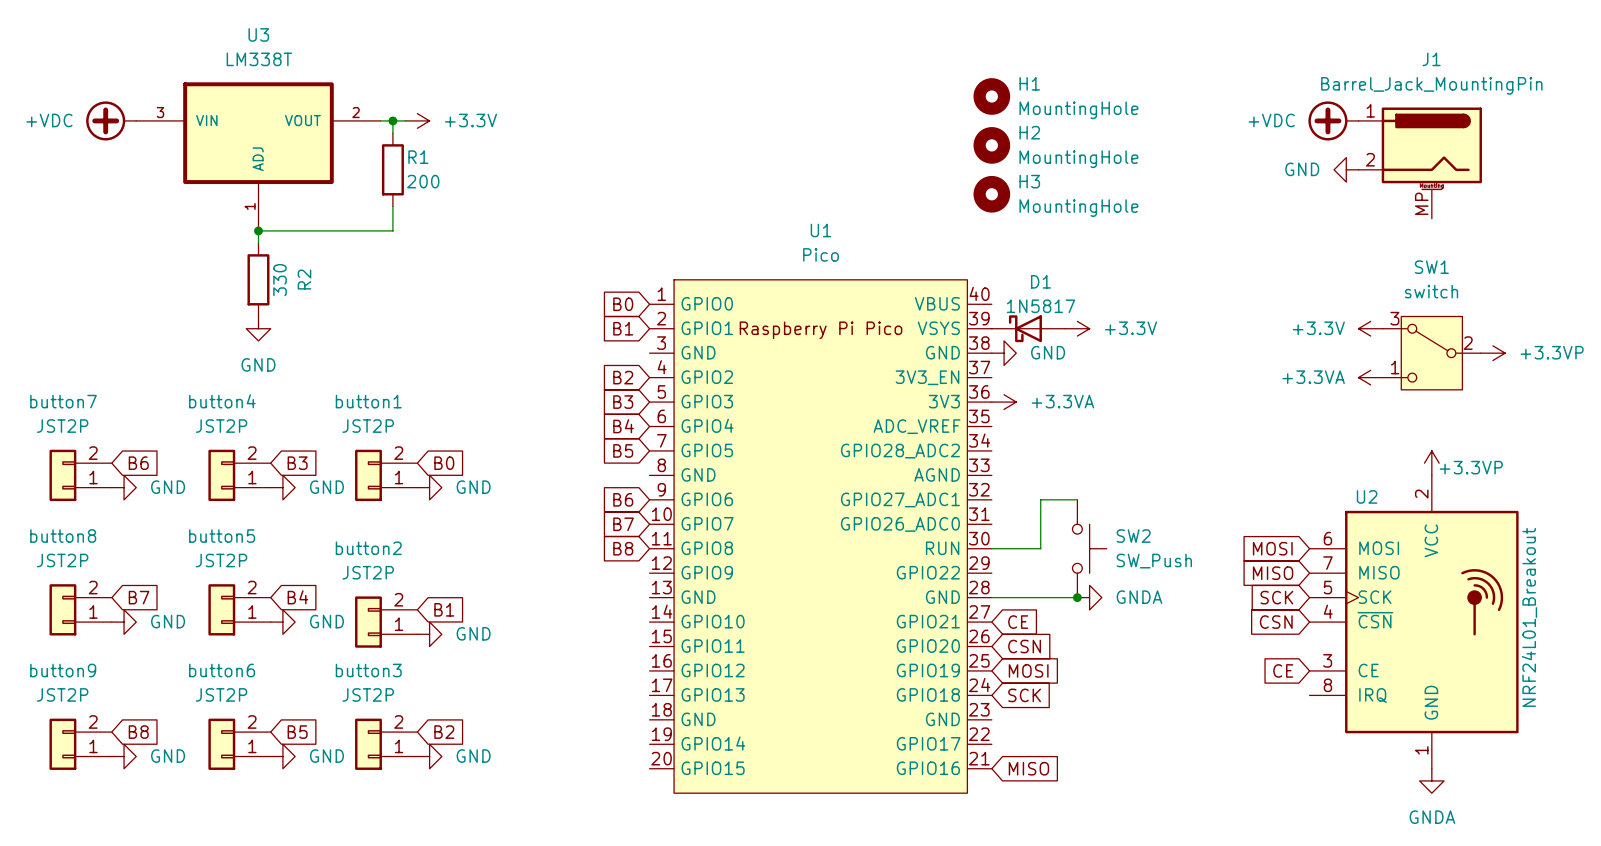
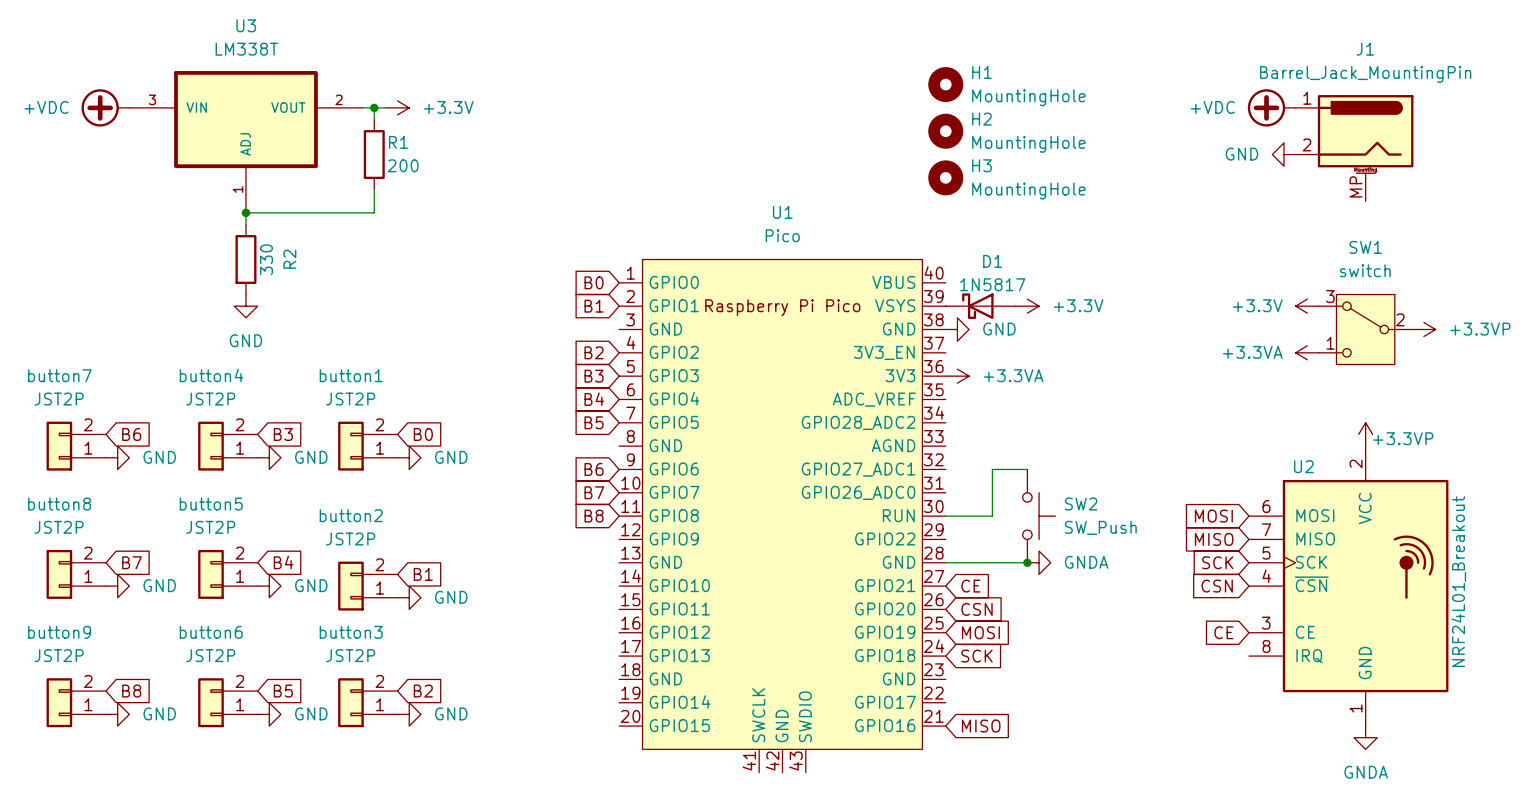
U1 symbol: [649, 279, 992, 794] -> [619, 259, 946, 773]

